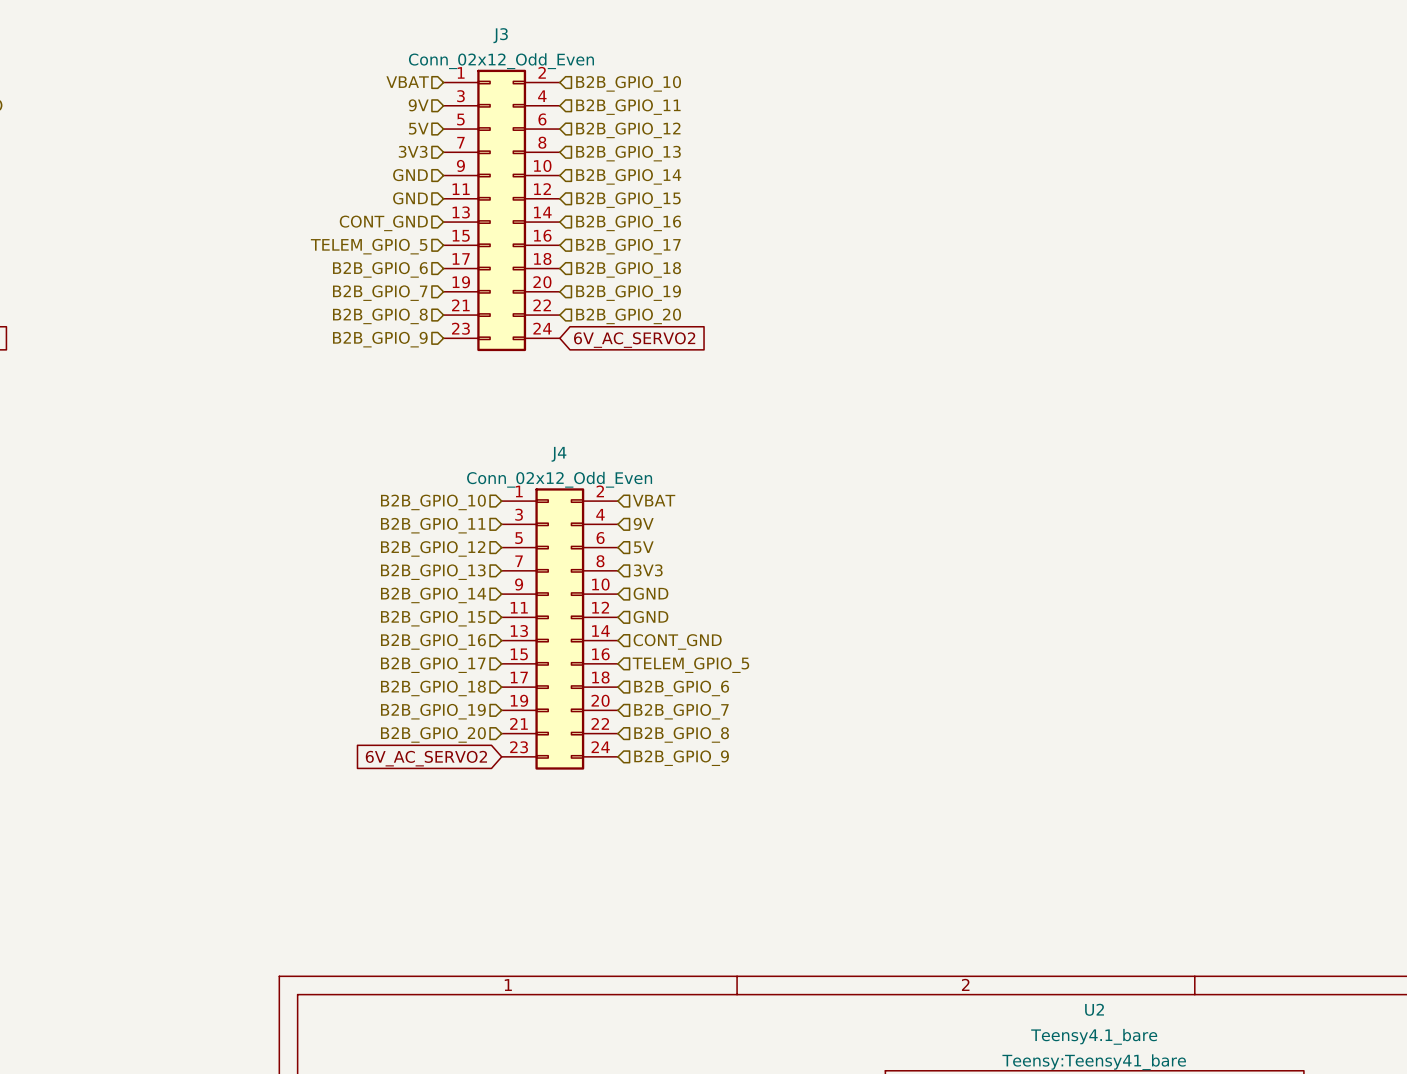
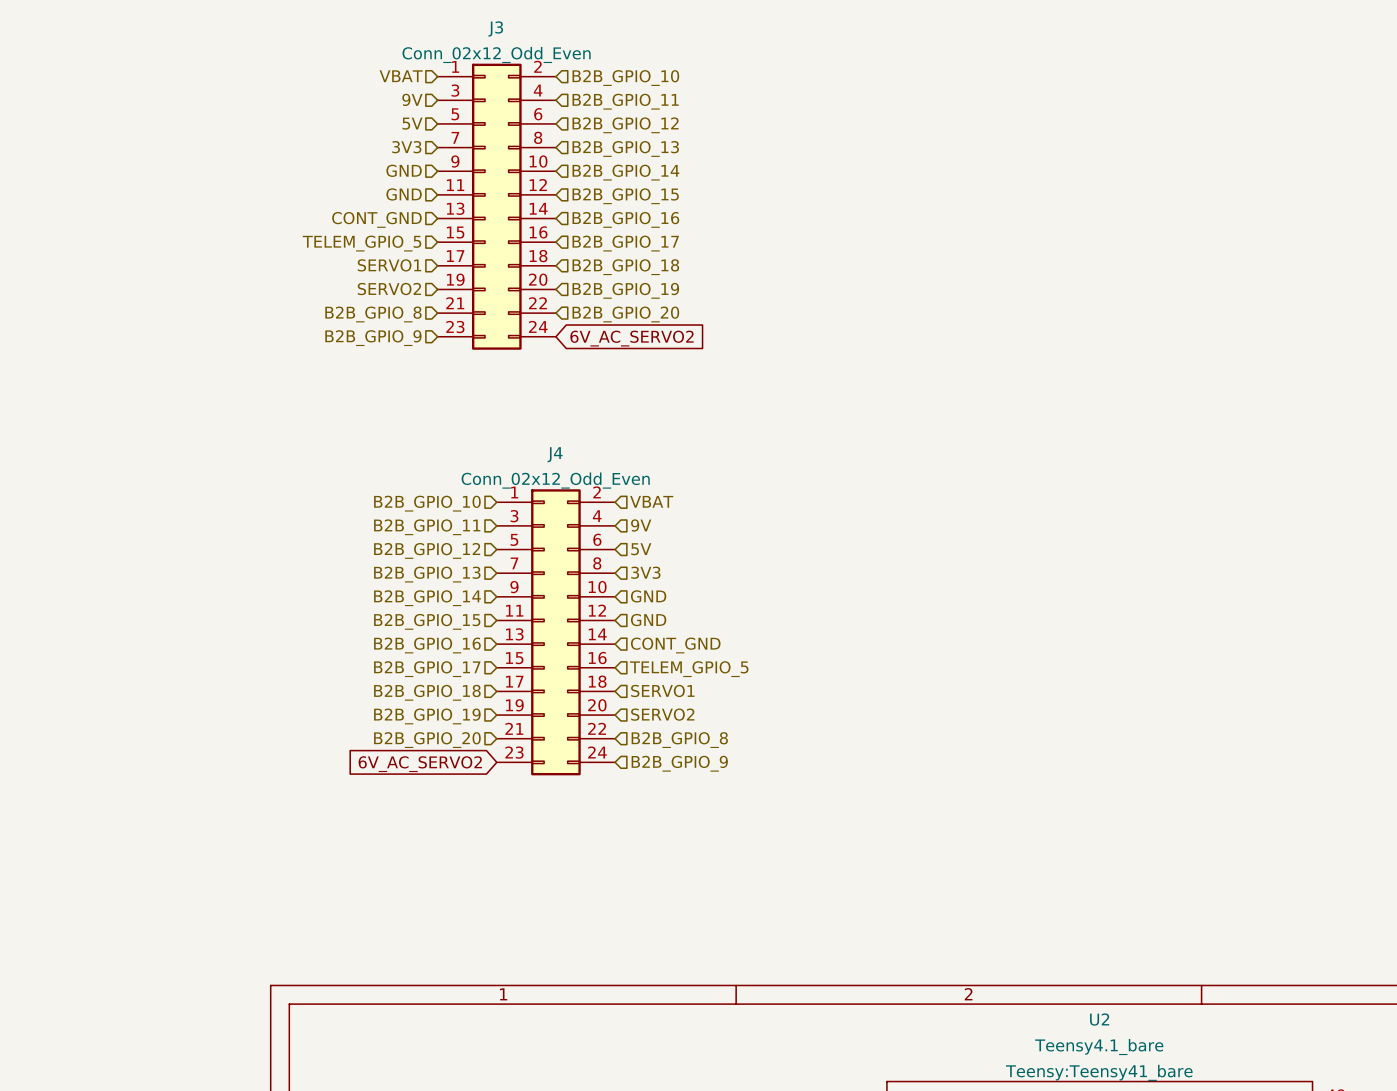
hierarchical label: B2B_GPIO_6 (380, 269) -> SERVO1 (389, 265)
hierarchical label: B2B_GPIO_7 (380, 293) -> SERVO2 (389, 289)
hierarchical label: B2B_GPIO_6 (681, 688) -> SERVO1 (662, 690)
hierarchical label: B2B_GPIO_7 (681, 711) -> SERVO2 (662, 714)

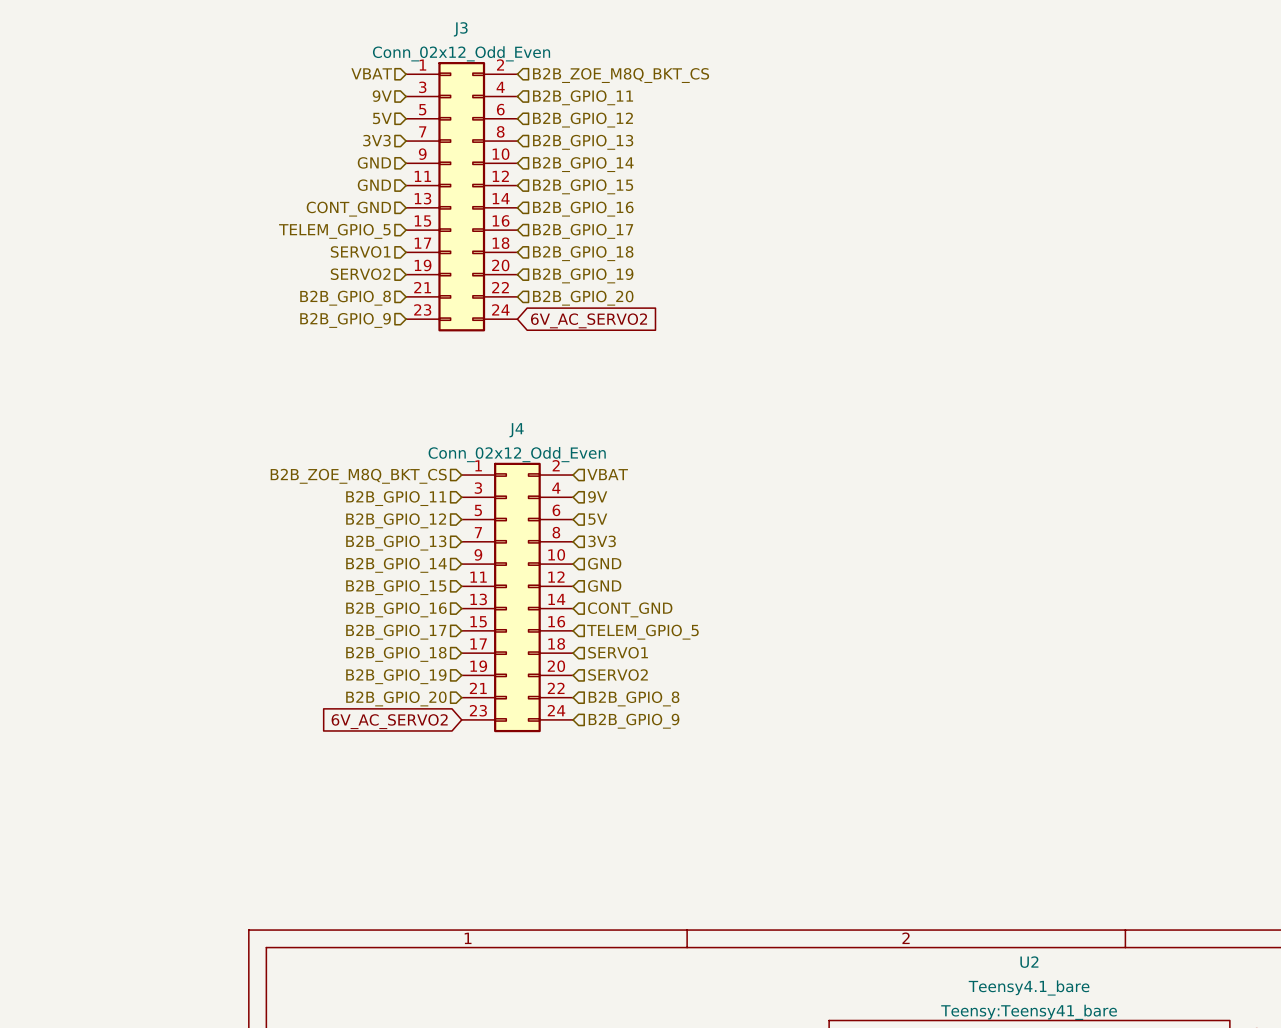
hierarchical label: B2B_GPIO_10 (625, 78) -> B2B_ZOE_M8Q_BKT_CS (621, 75)
hierarchical label: B2B_GPIO_10 (427, 503) -> B2B_ZOE_M8Q_BKT_CS (358, 476)

